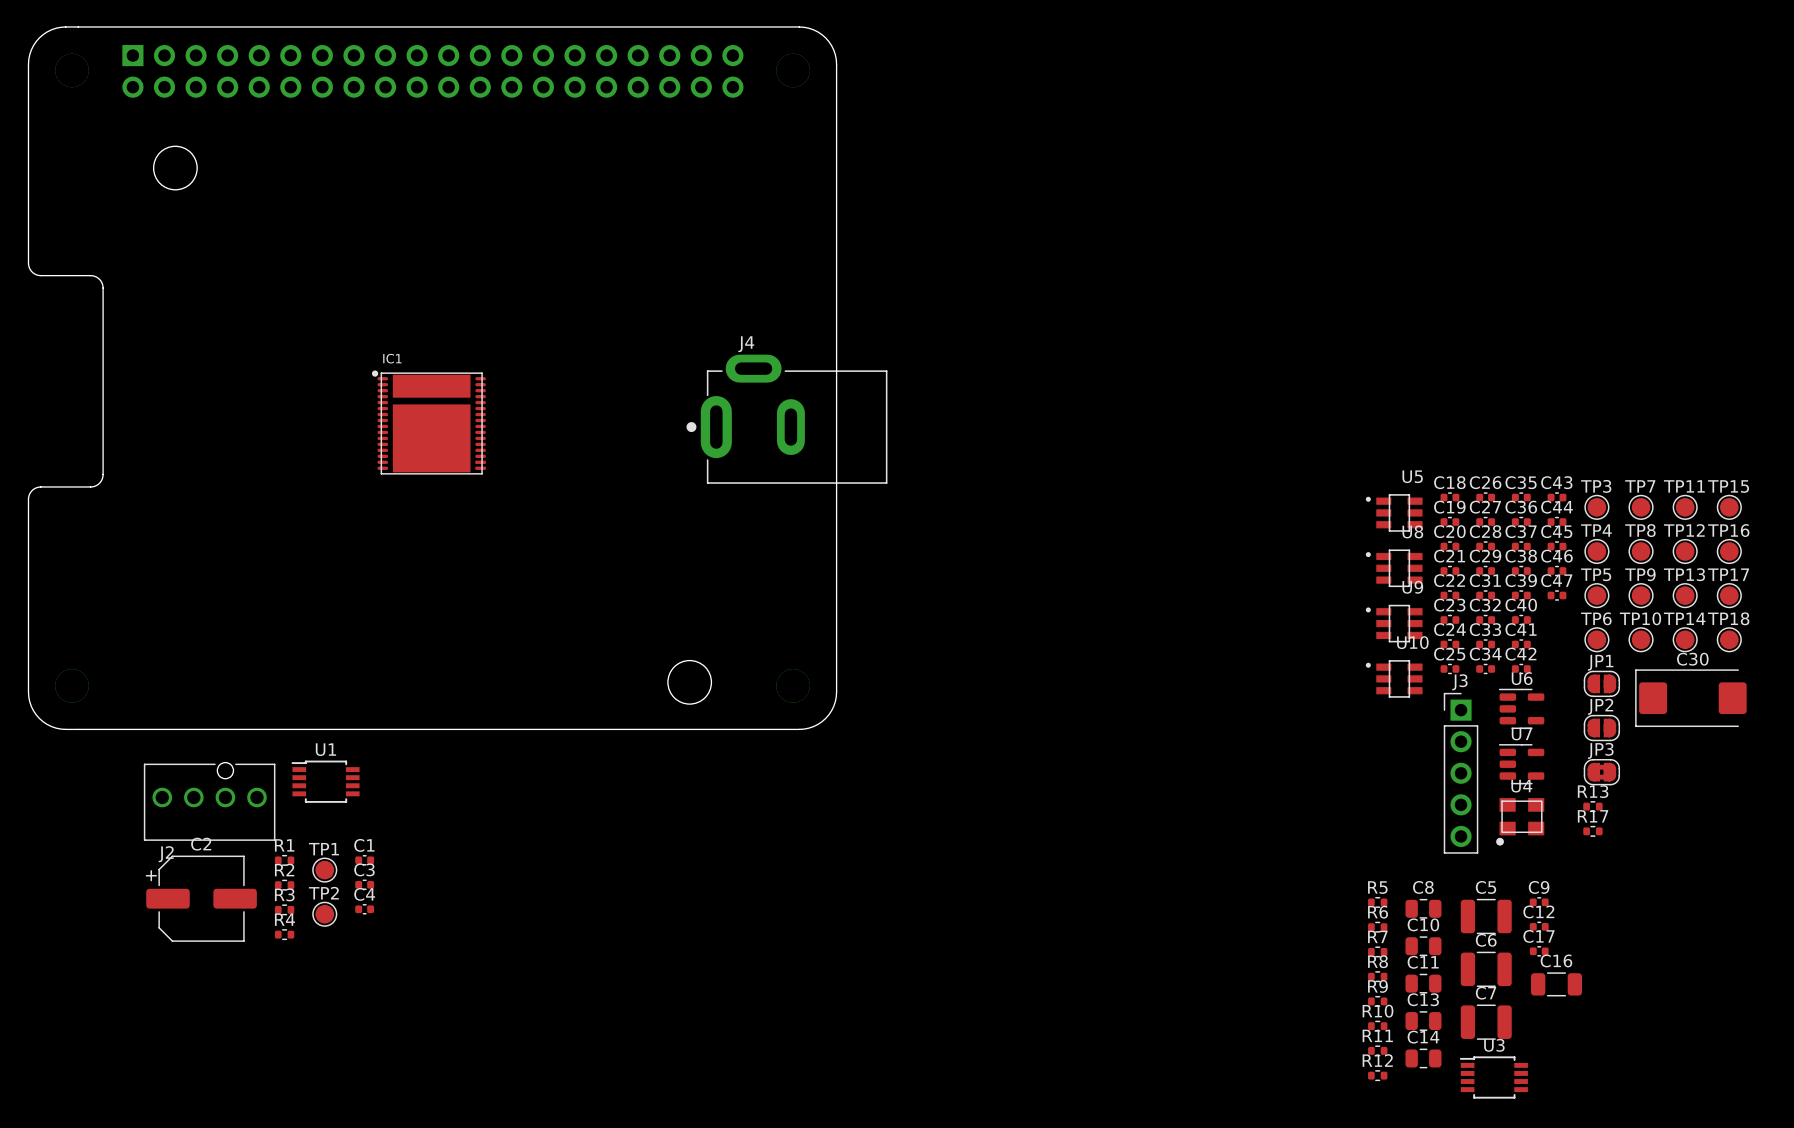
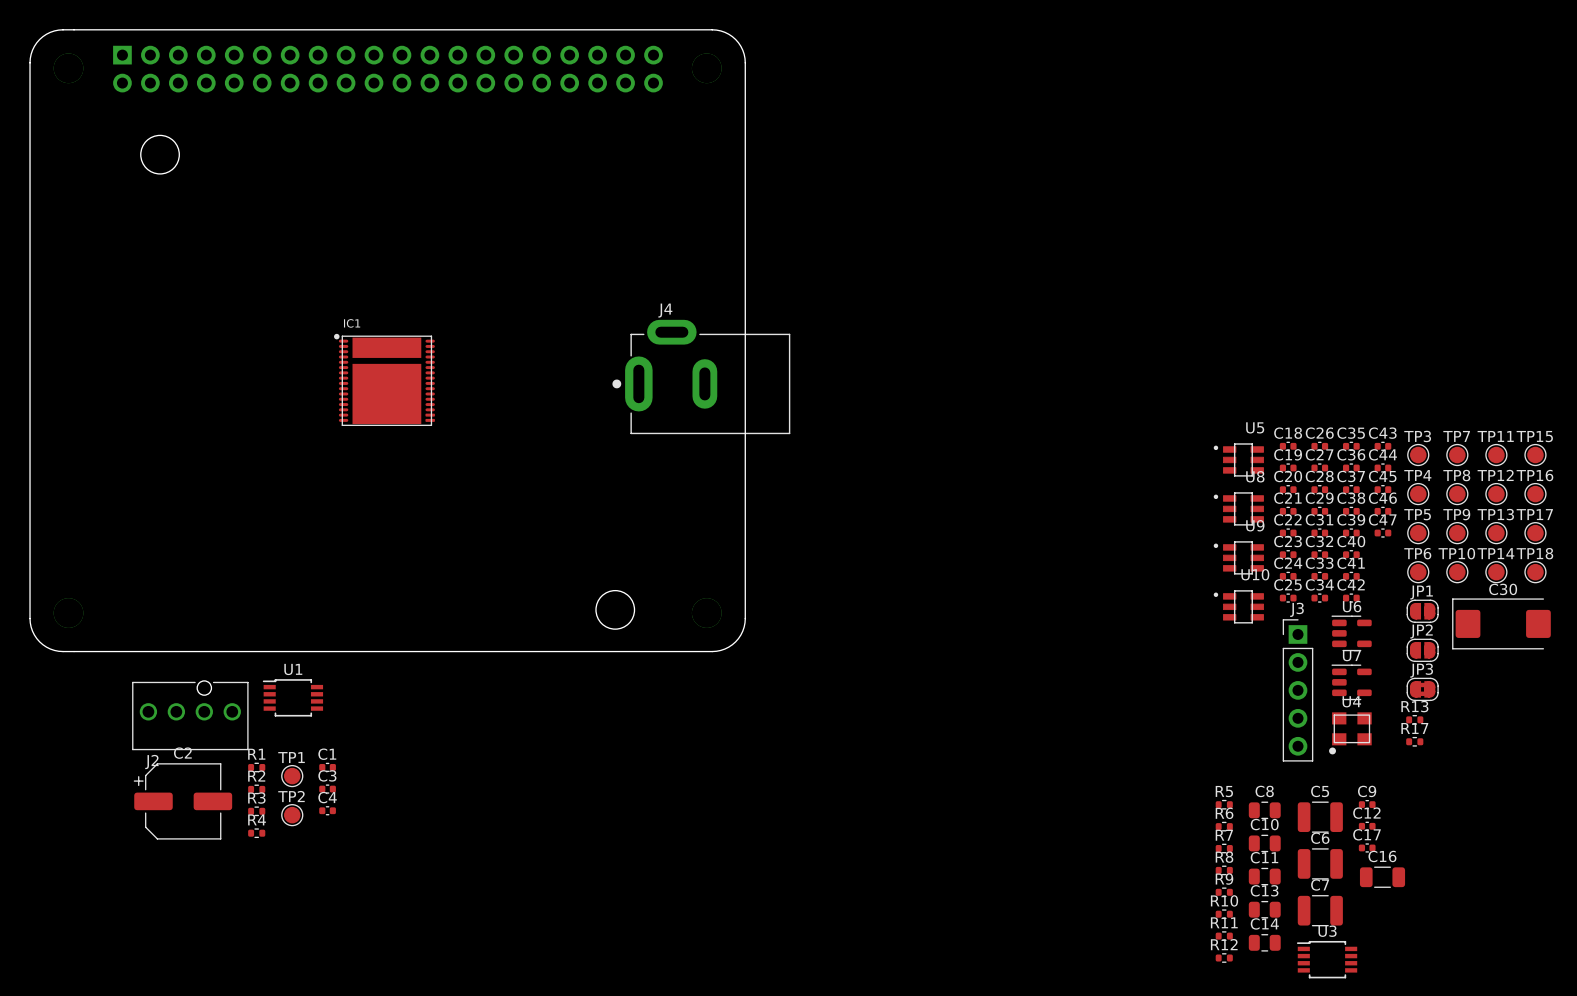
board edge: (28, 263) (30, 269) (36, 274) (93, 275) (100, 280) (103, 288) (102, 478) (98, 484) (92, 486) (38, 487) (31, 491) (28, 499) -> (30, 238) (30, 447)

